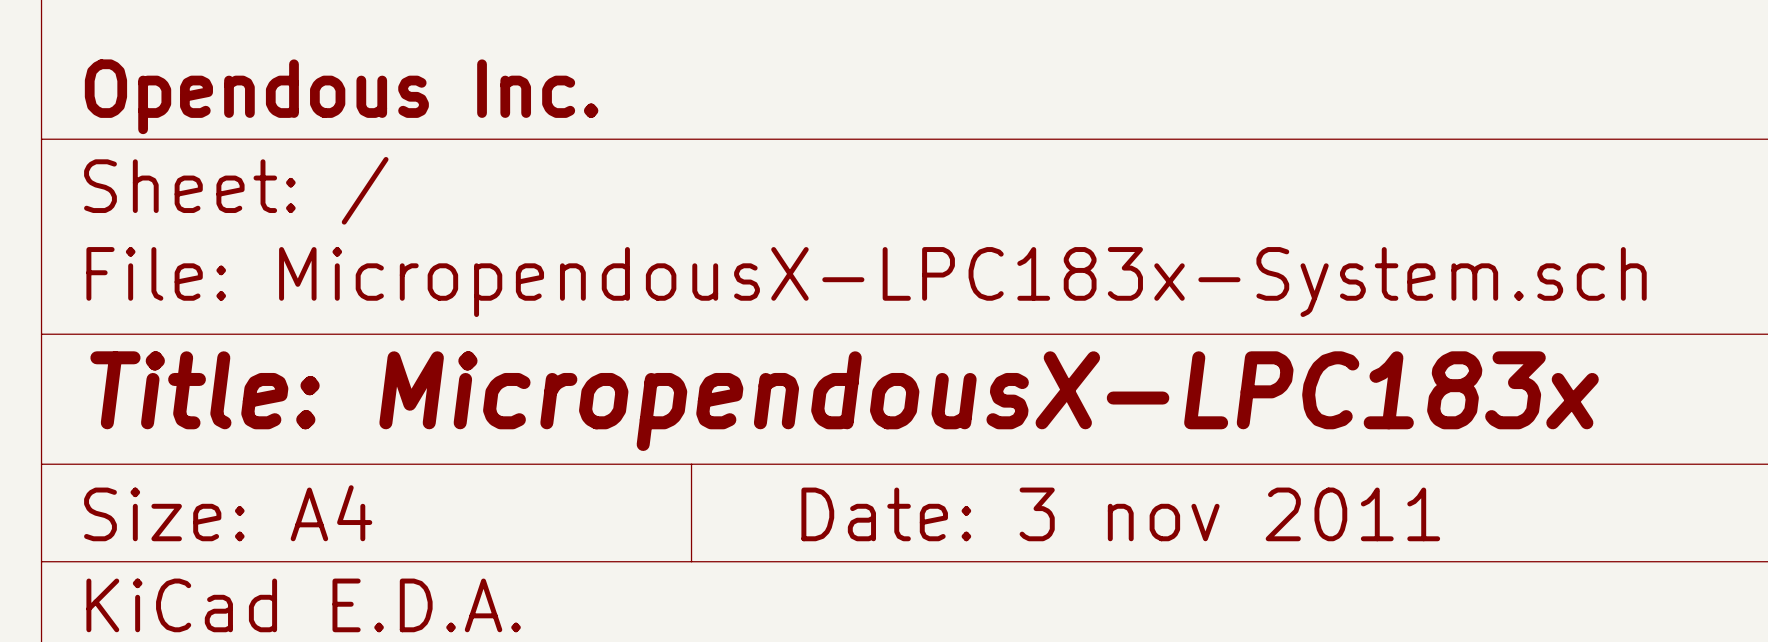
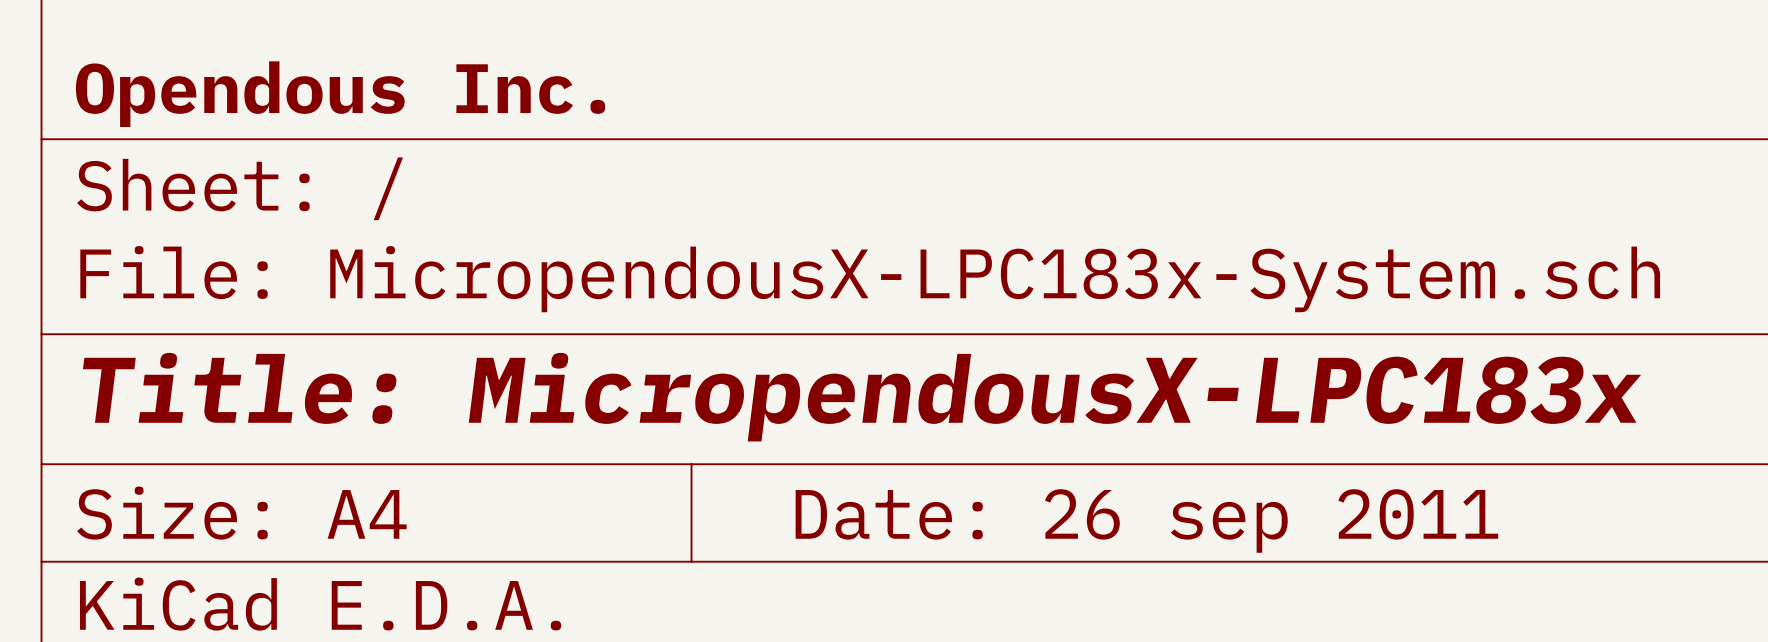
title block: Date: 3 nov 2011 (1120, 514) -> Date: 26 sep 2011 (1146, 520)

